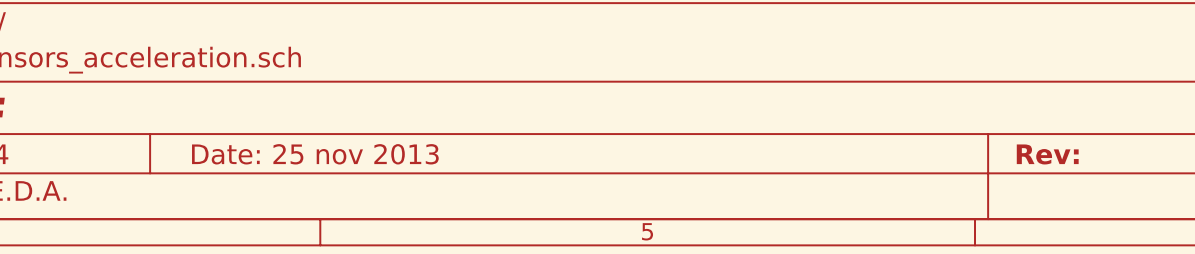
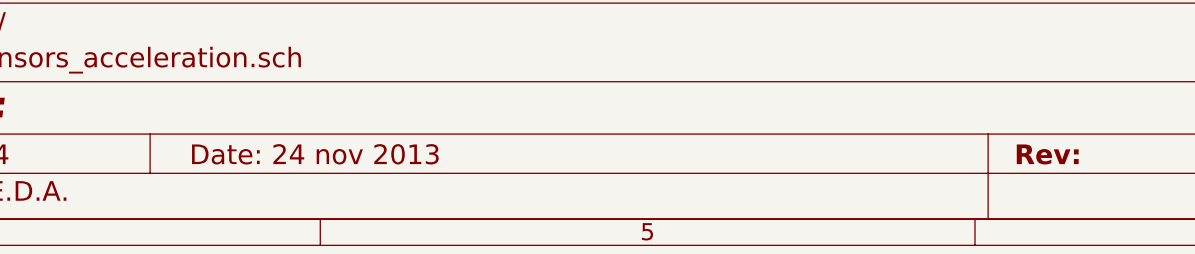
title block: Date: 25 nov 2013 (315, 154) -> Date: 24 nov 2013 (315, 154)

